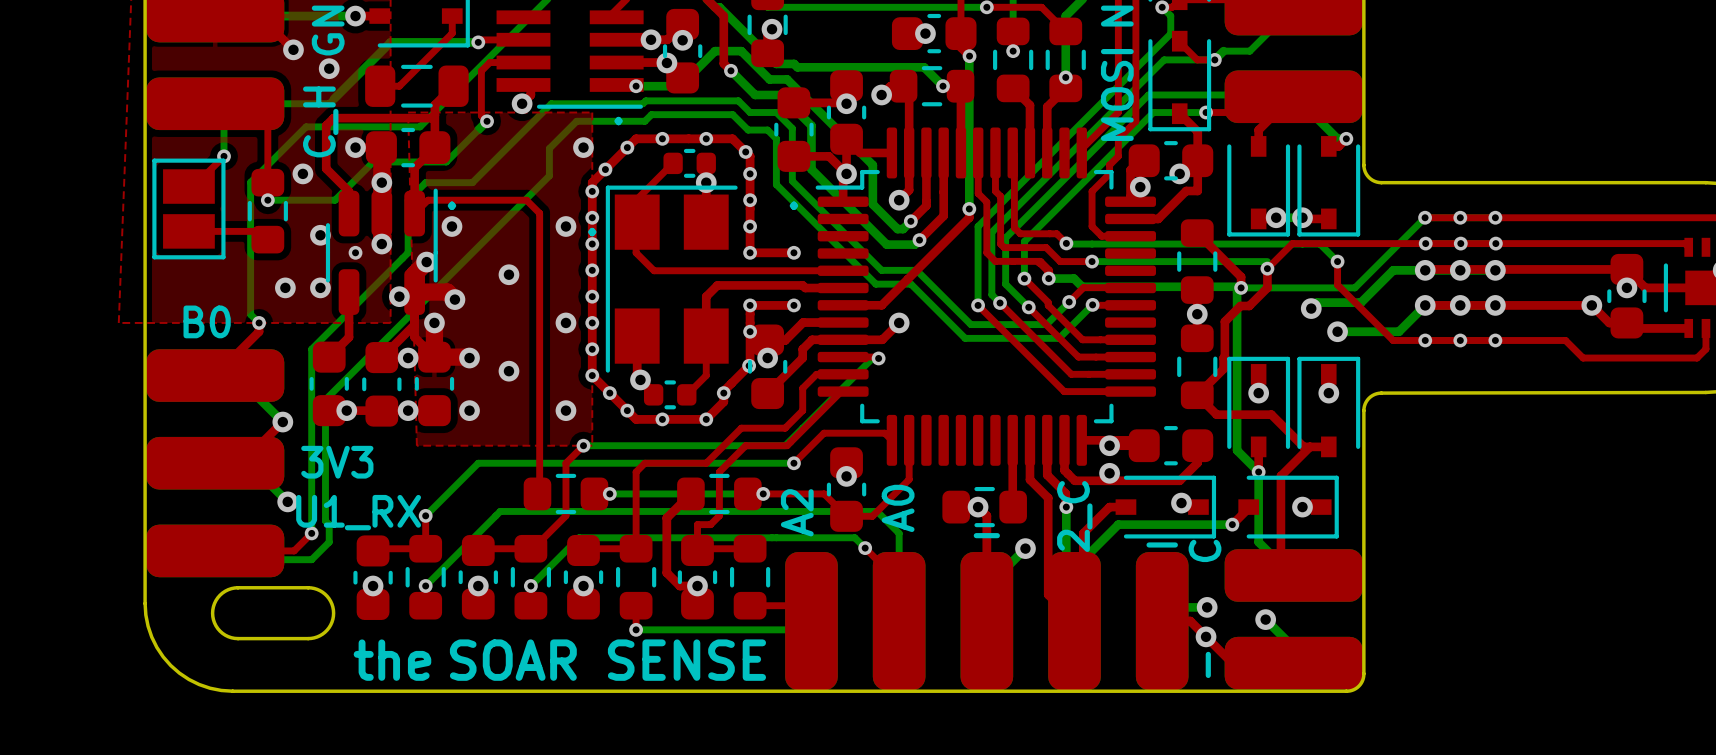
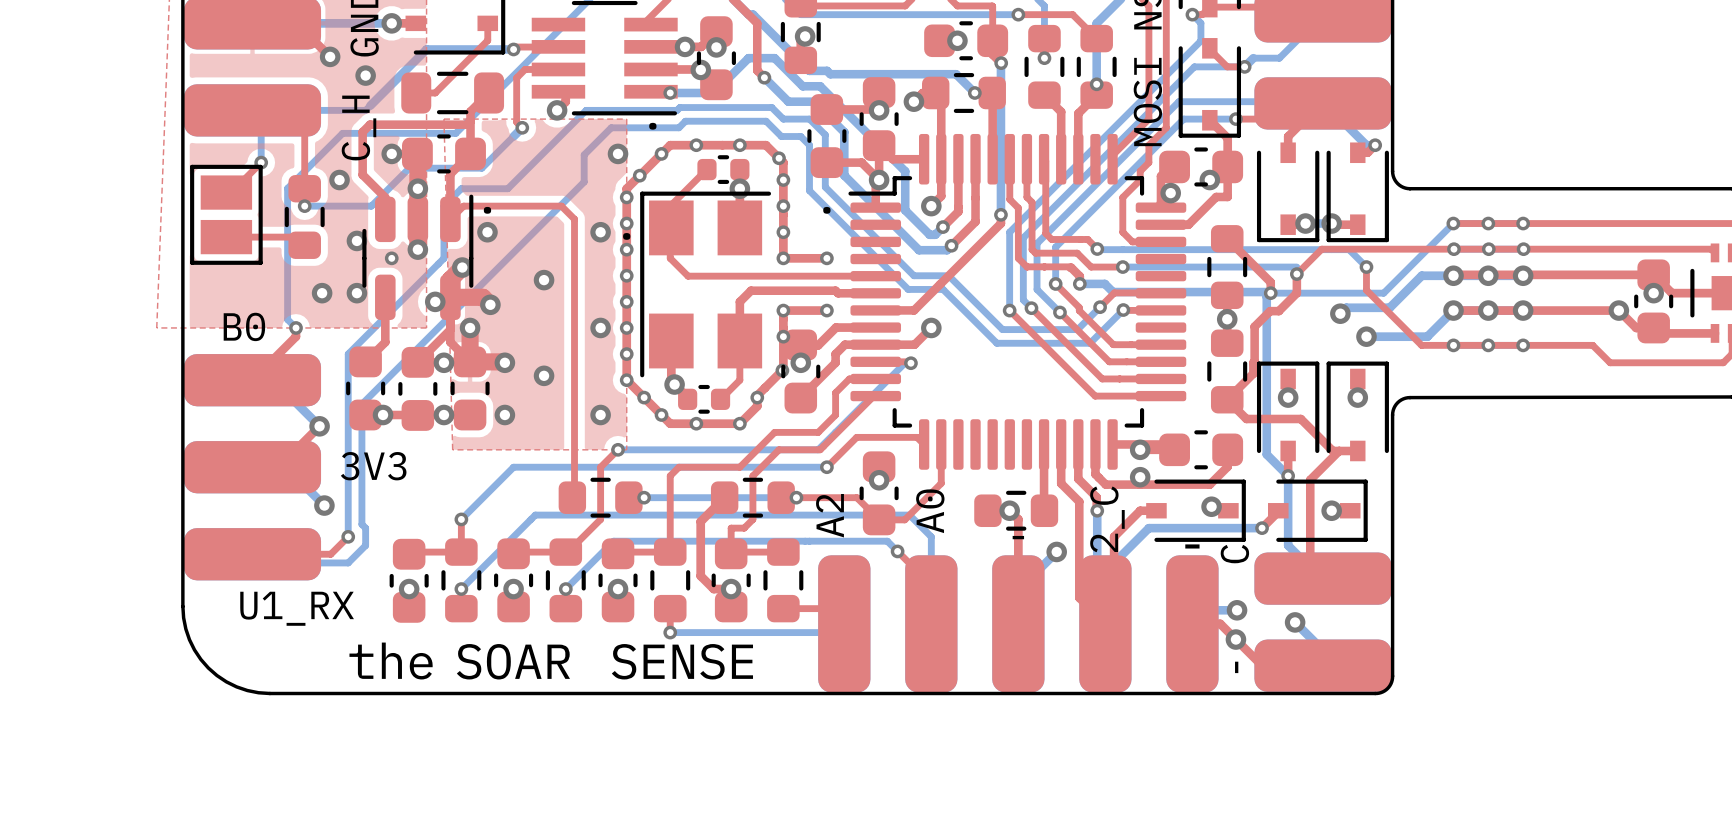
text position: U1_RX (358, 512) -> U1_RX (297, 608)
board edge: (238, 587) (317, 589) (325, 594) (331, 604) (333, 613) (331, 622) (325, 632) (311, 638) (238, 638) (228, 636) (216, 625) (212, 609) (216, 600) (222, 593) (238, 587) -> none
text position: the (392, 660) -> the (391, 661)
text position: SOAR (513, 660) -> SOAR (513, 661)
text position: SENSE (686, 660) -> SENSE (682, 661)

